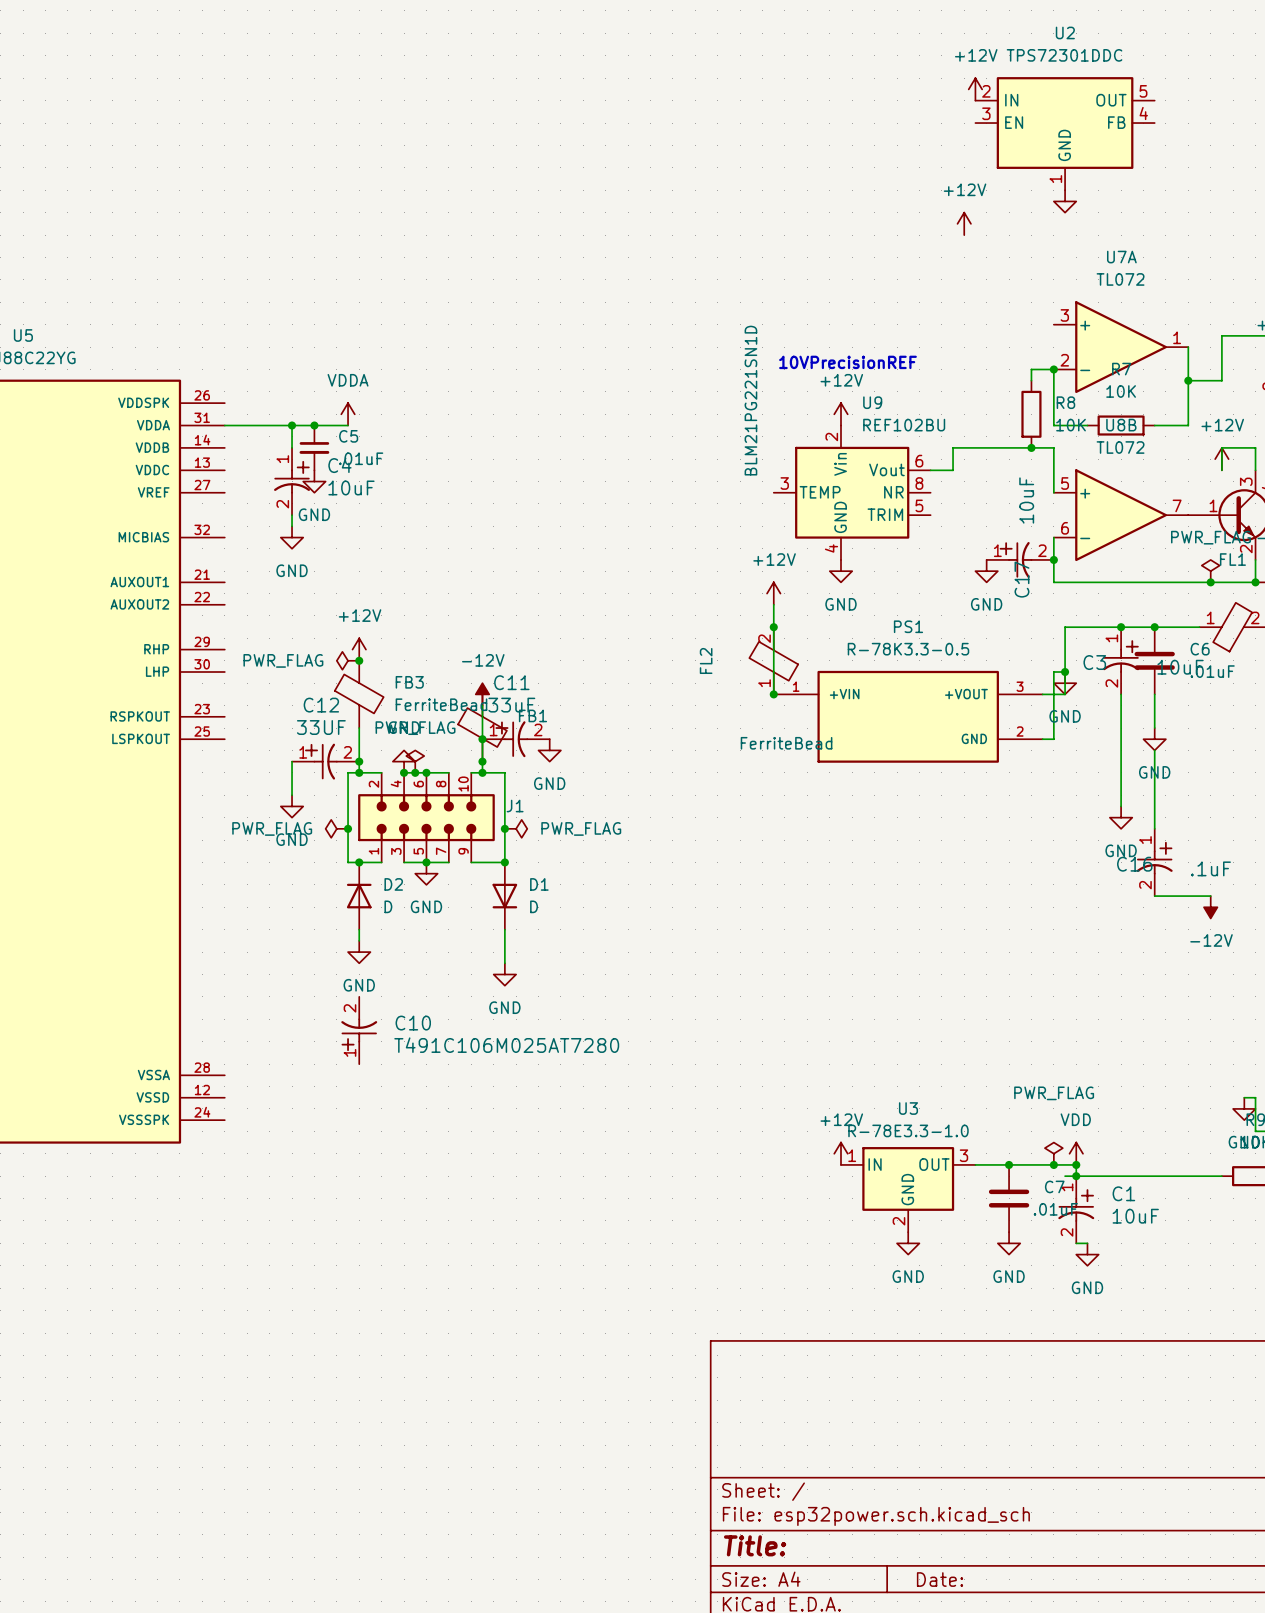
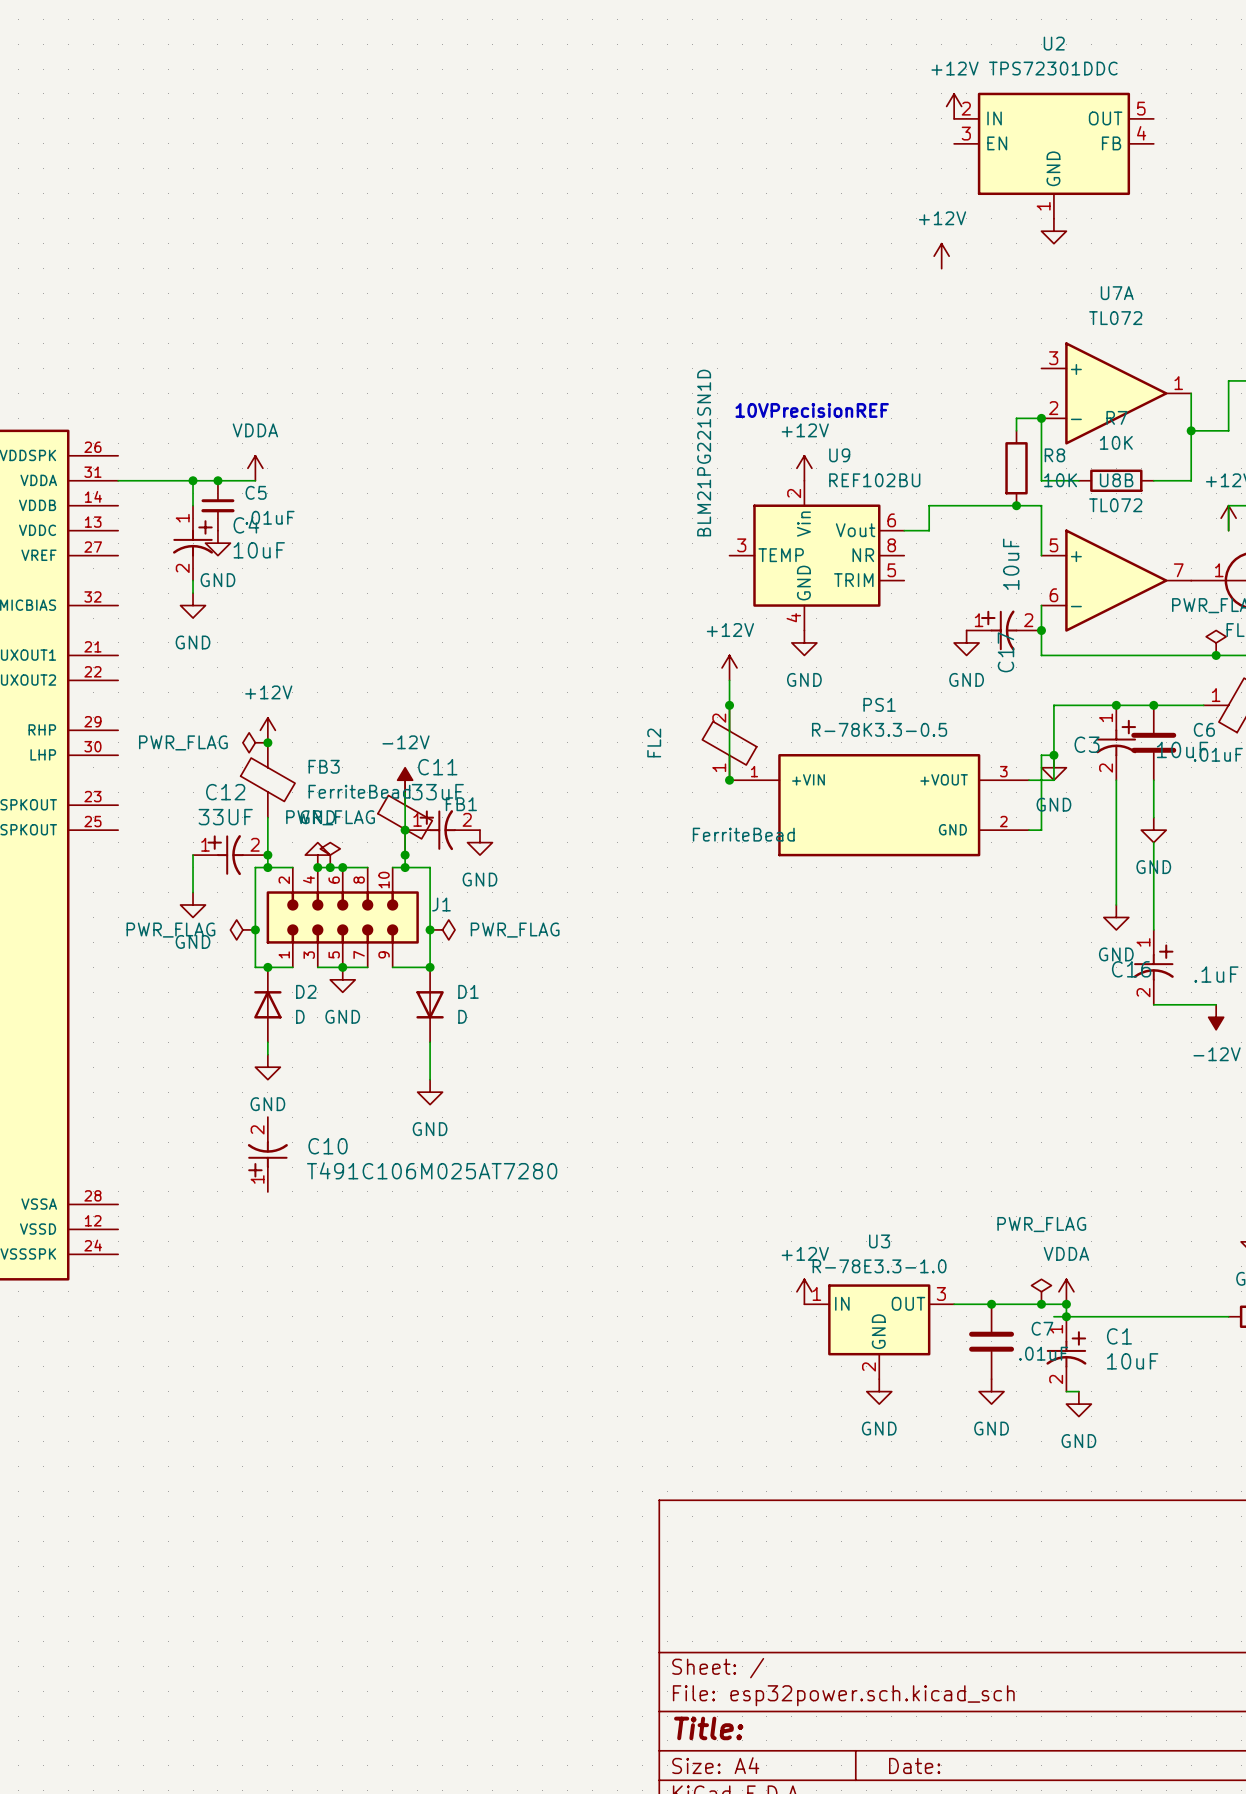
power symbol: VDD (1076, 1153) -> VDDA (1066, 1291)

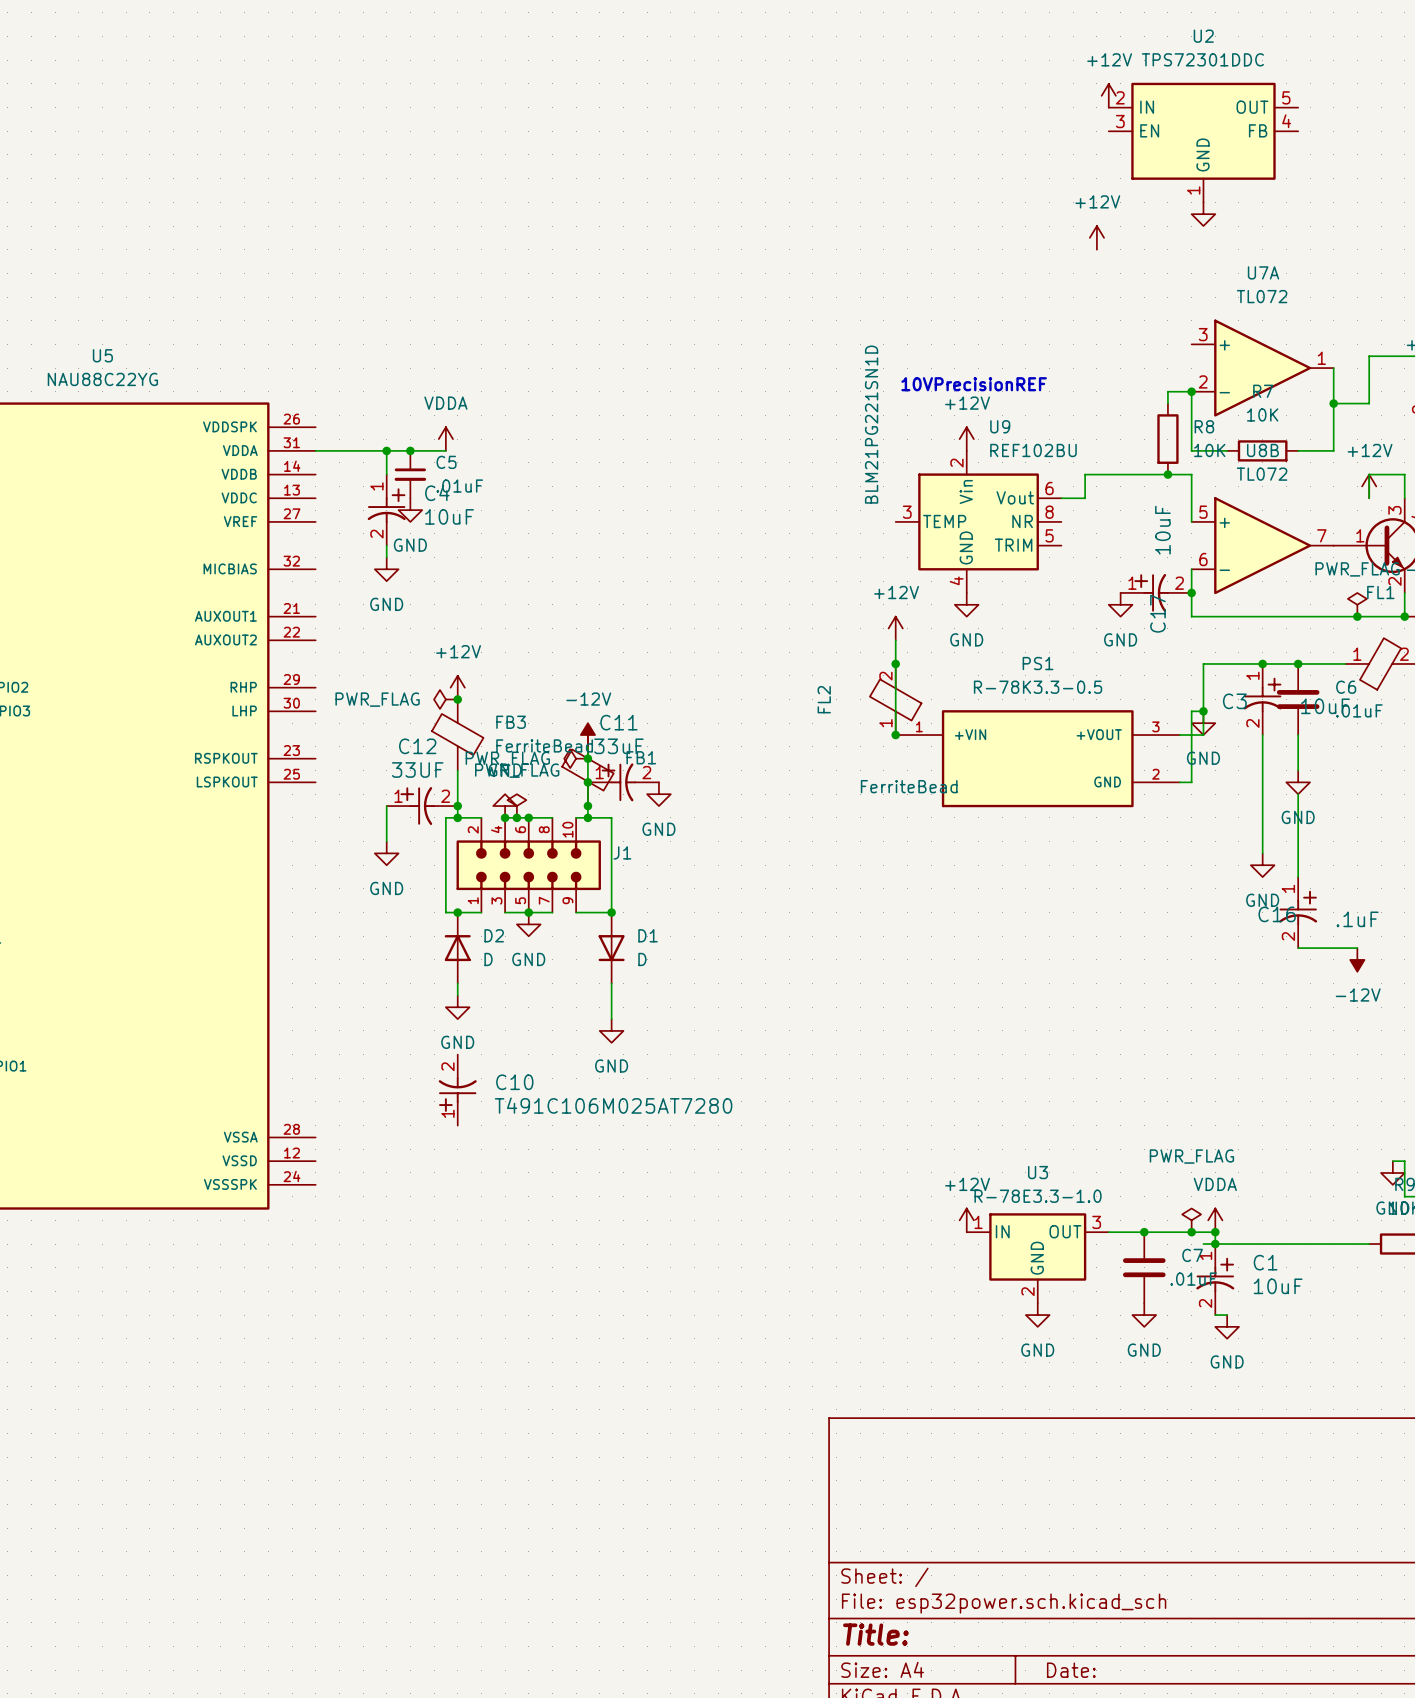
power symbol: none -> PWR_FLAG (576, 758)
junction: none -> (587, 758)
power symbol: PWR_FLAG (242, 929) -> none
junction: (255, 929) -> none
junction: (430, 929) -> none
power symbol: PWR_FLAG (442, 929) -> none

